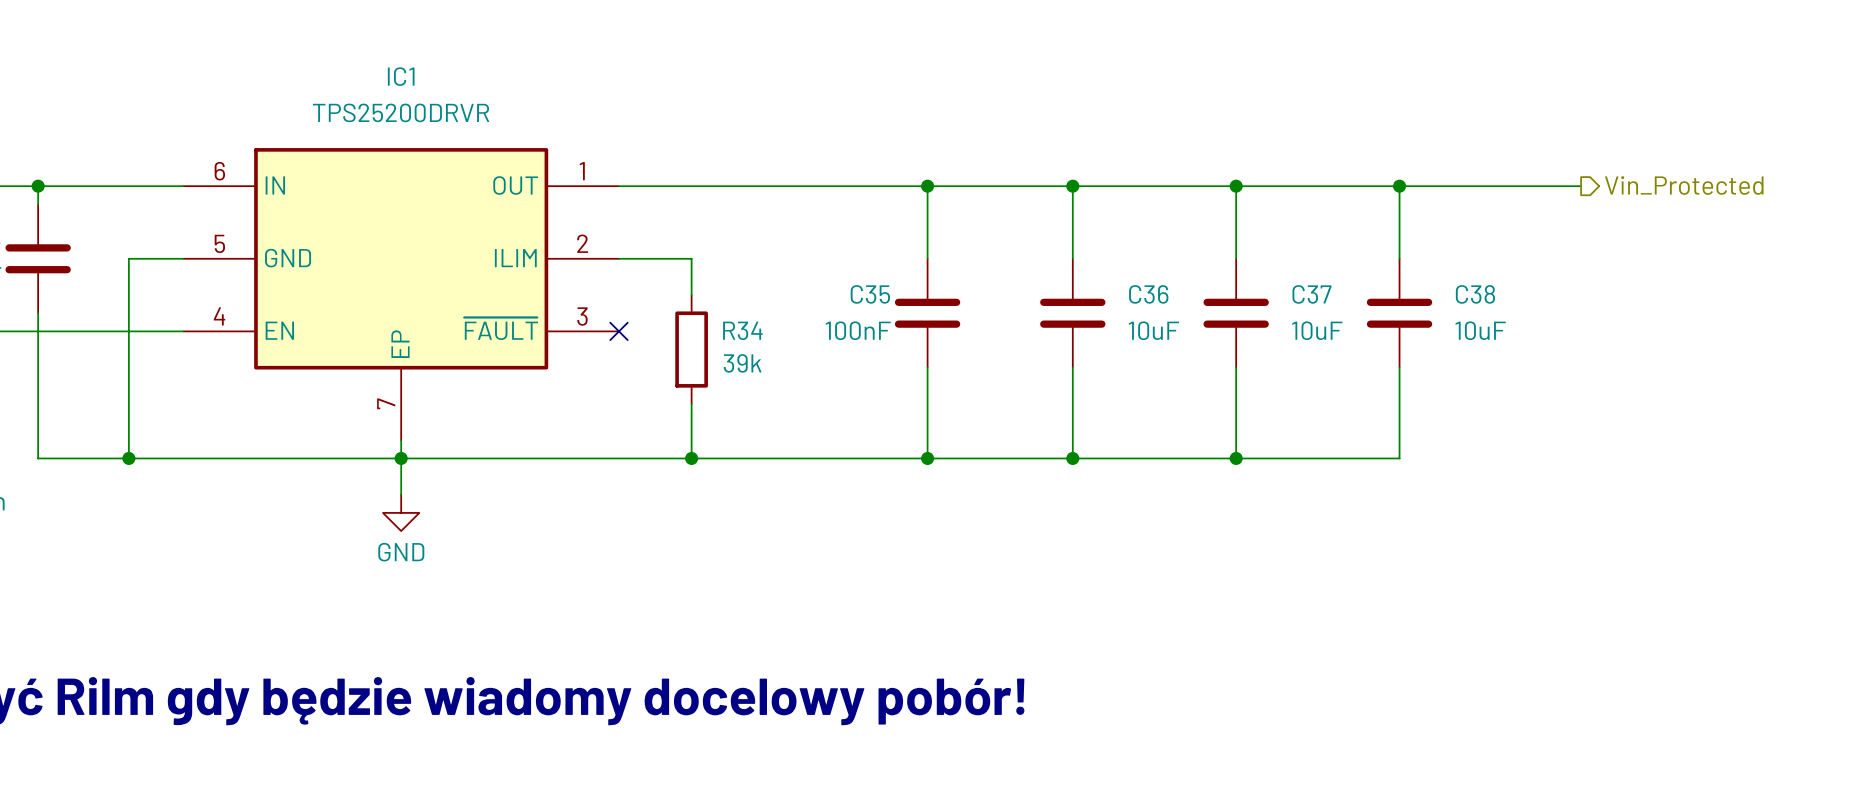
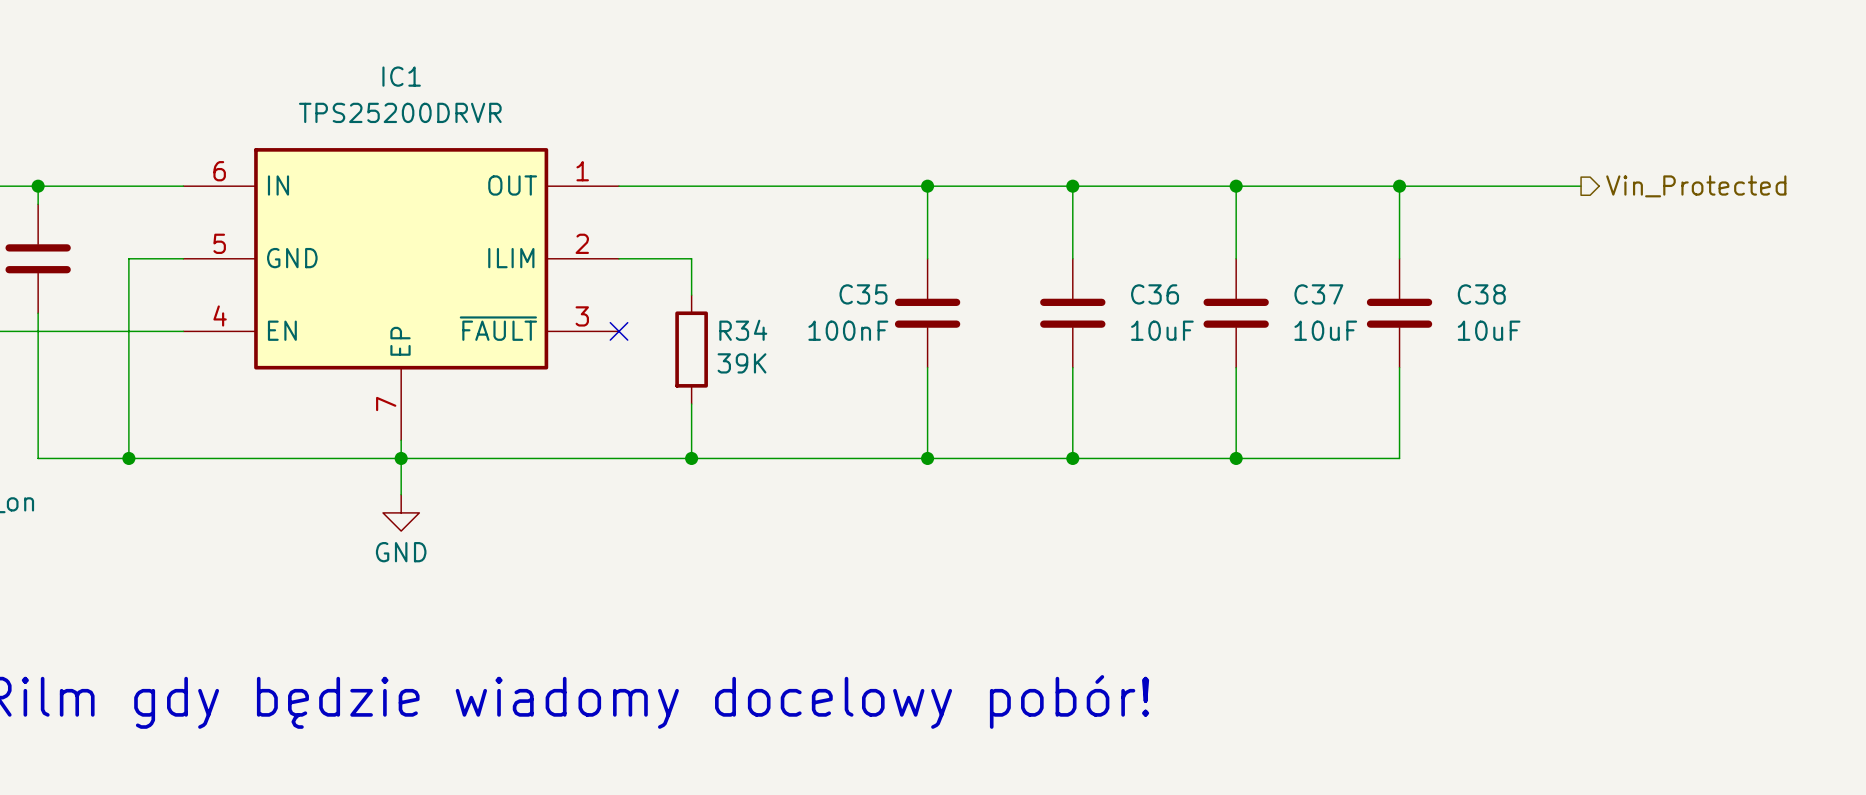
R34 value: 39k (742, 363) -> 39K (742, 363)

